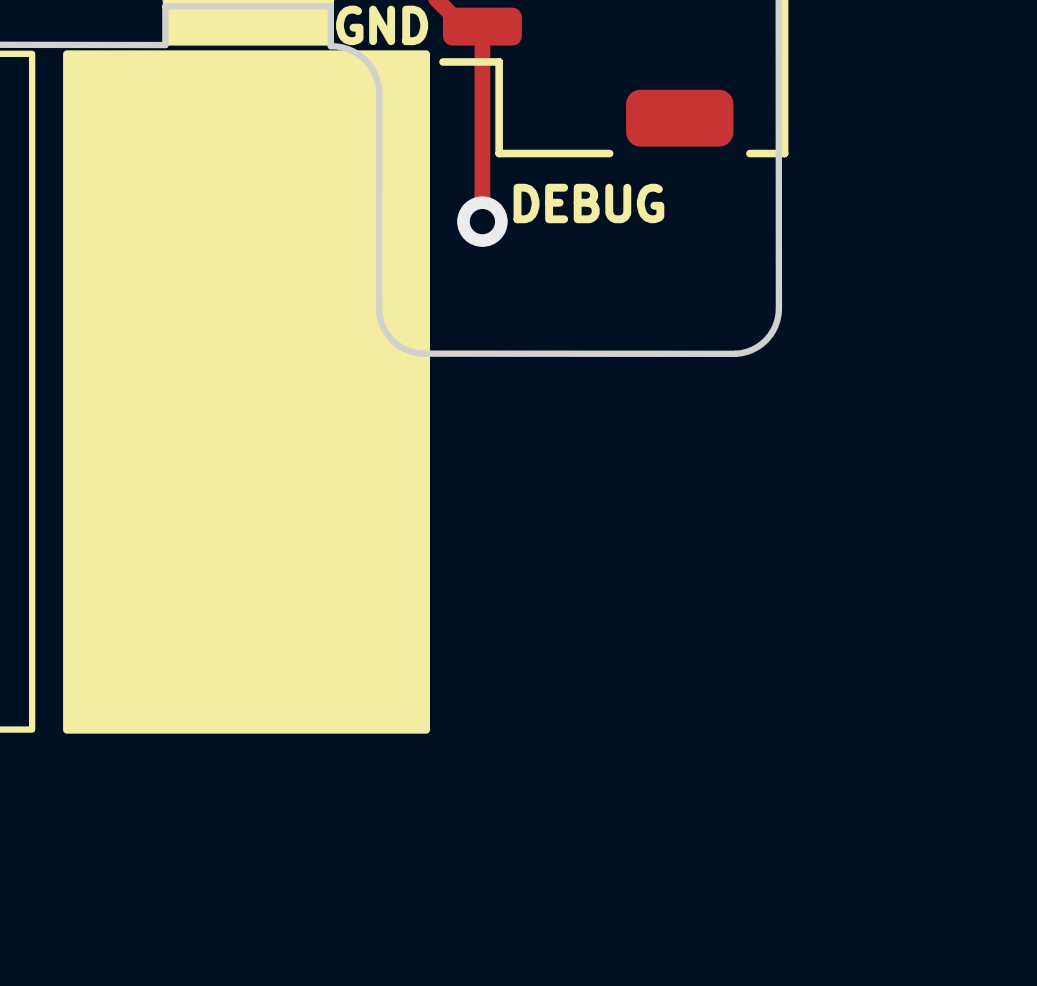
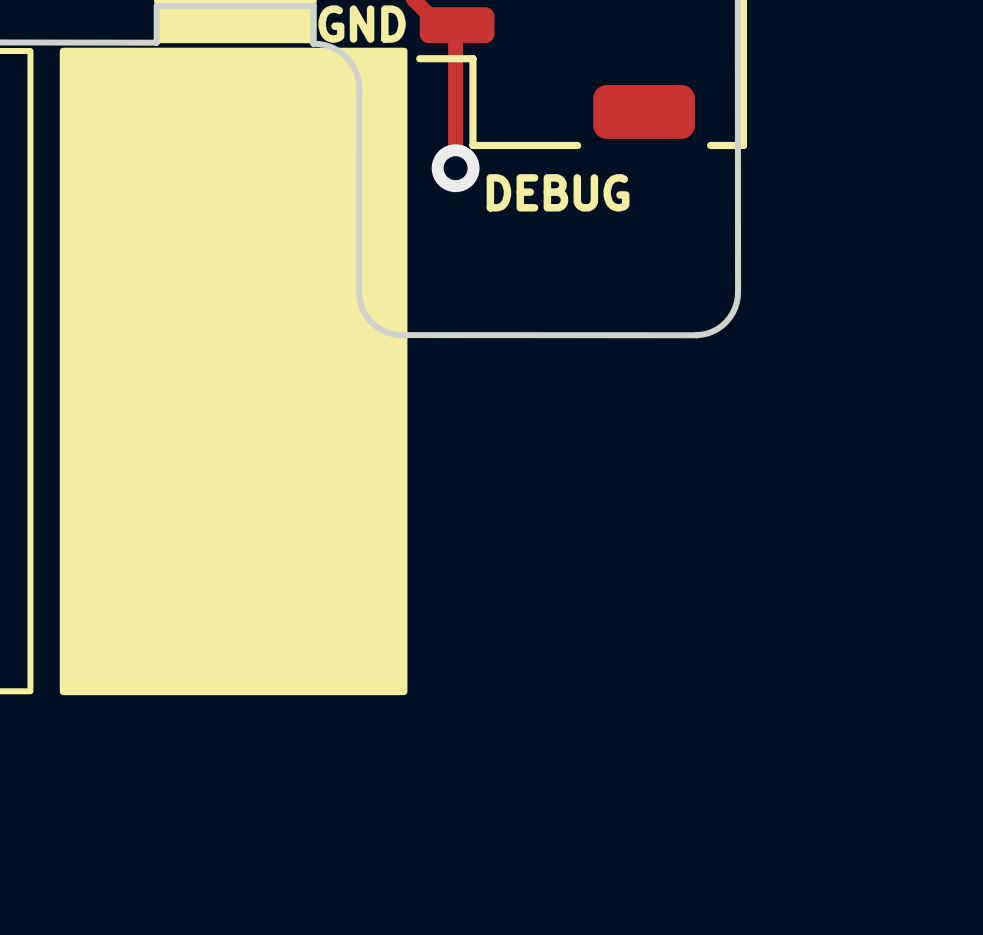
track: (482, 26) (482, 221) -> (457, 25) (455, 168) (457, 166)
via position: (482, 221) -> (455, 168)

